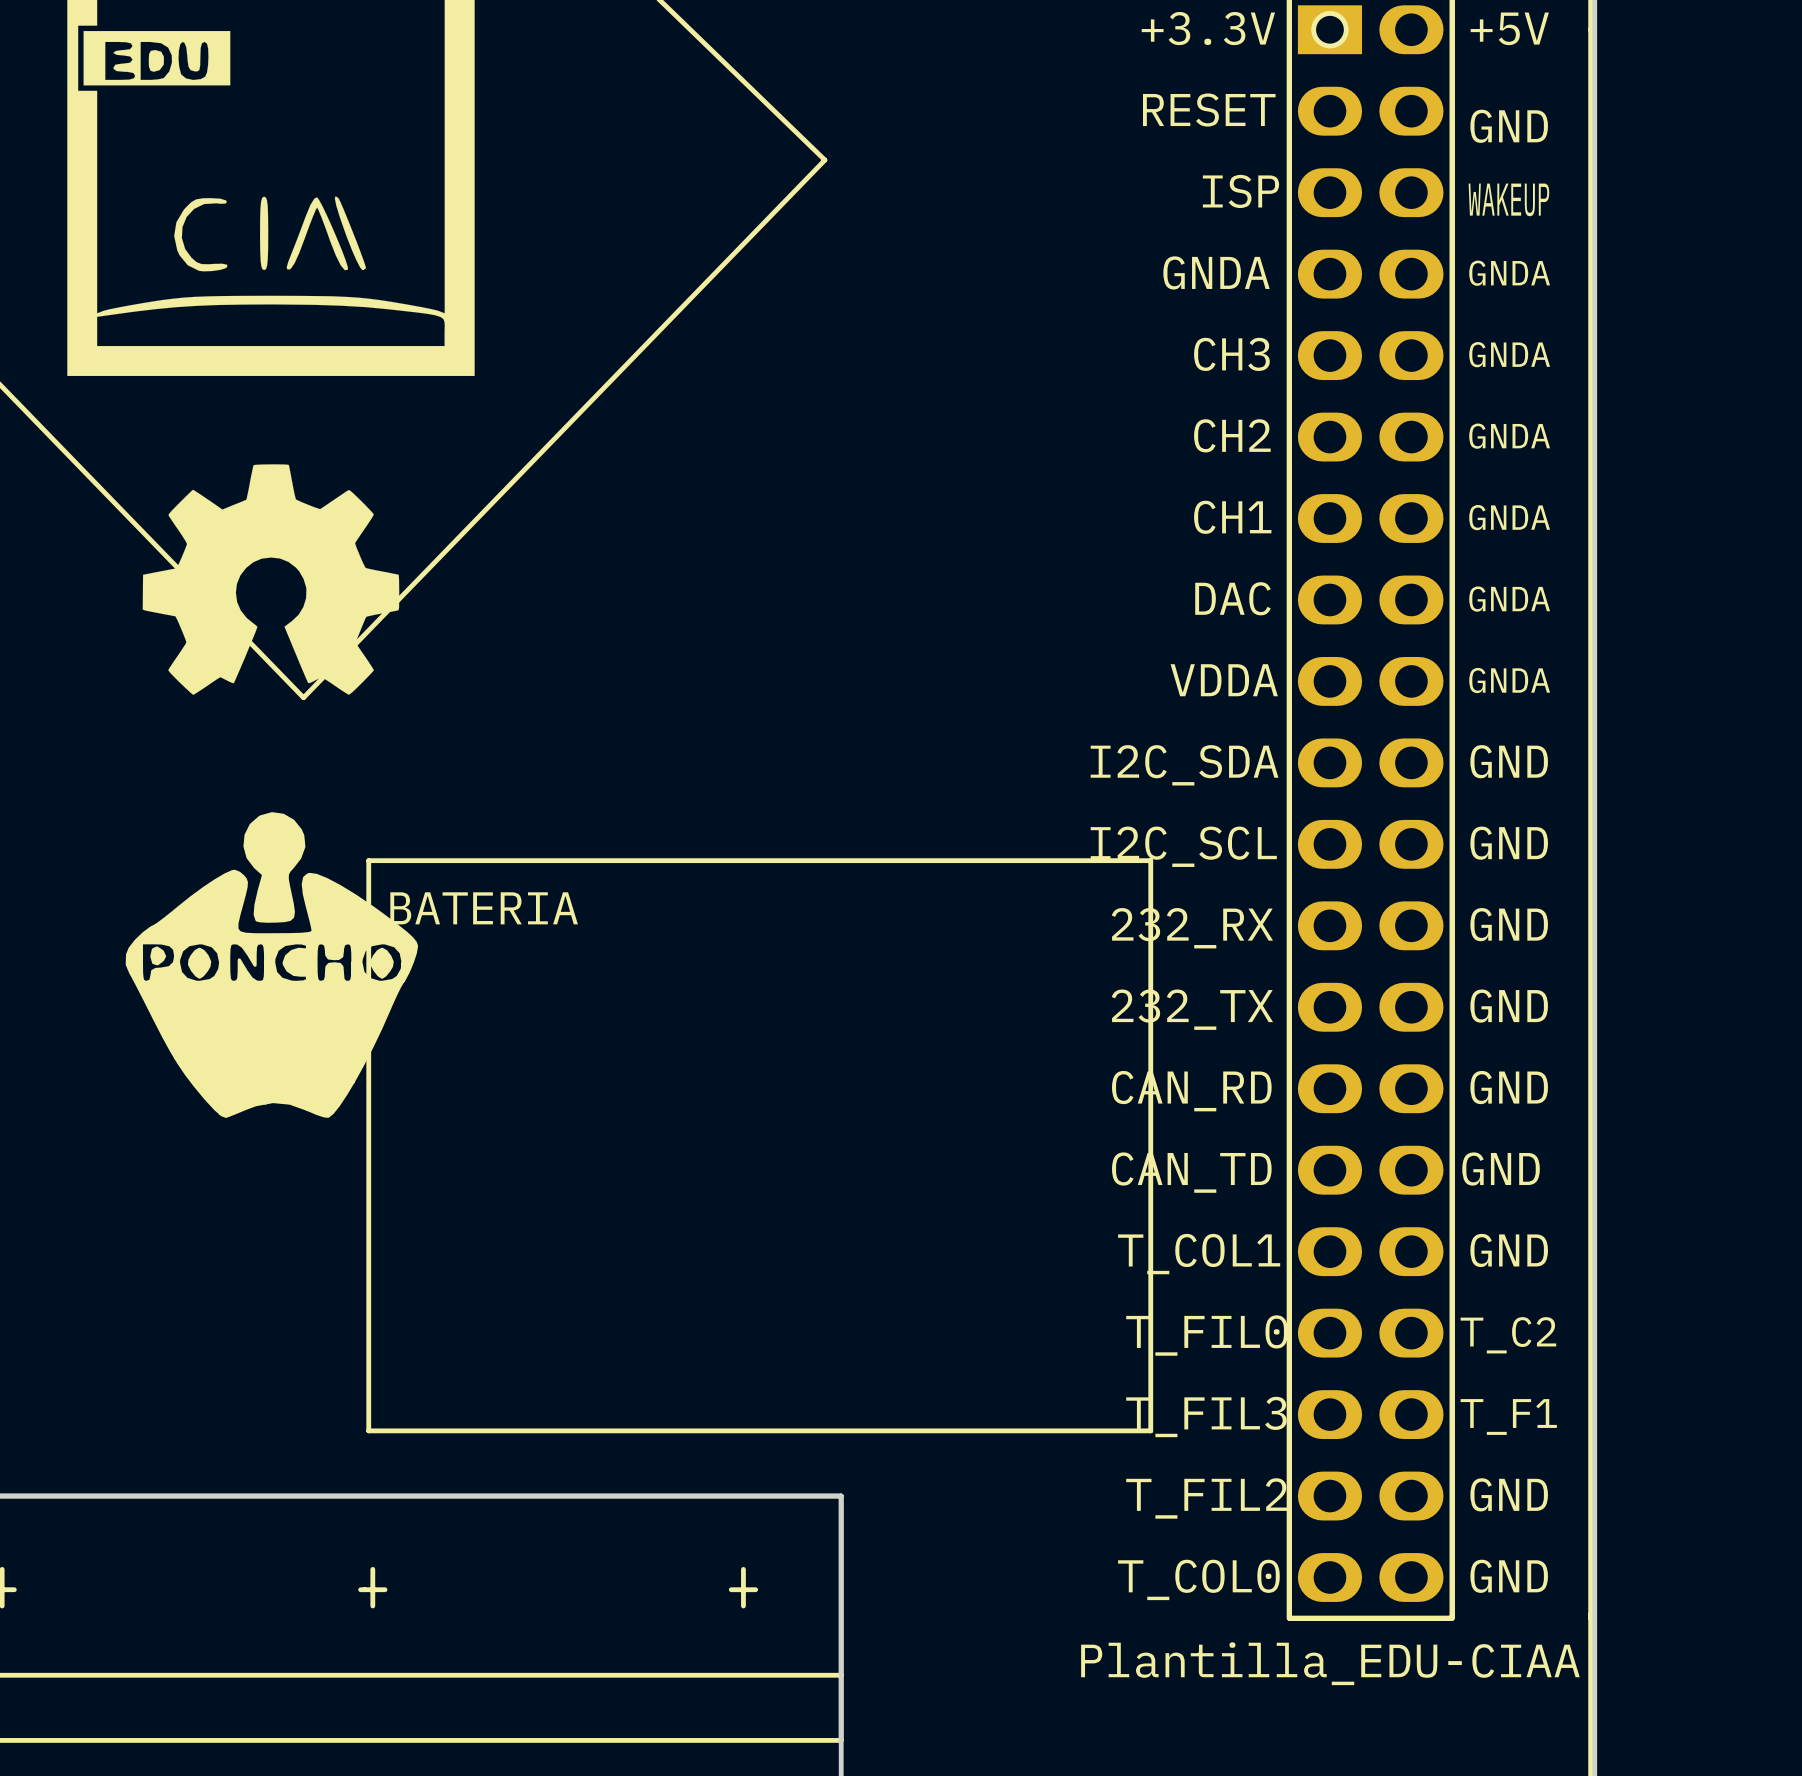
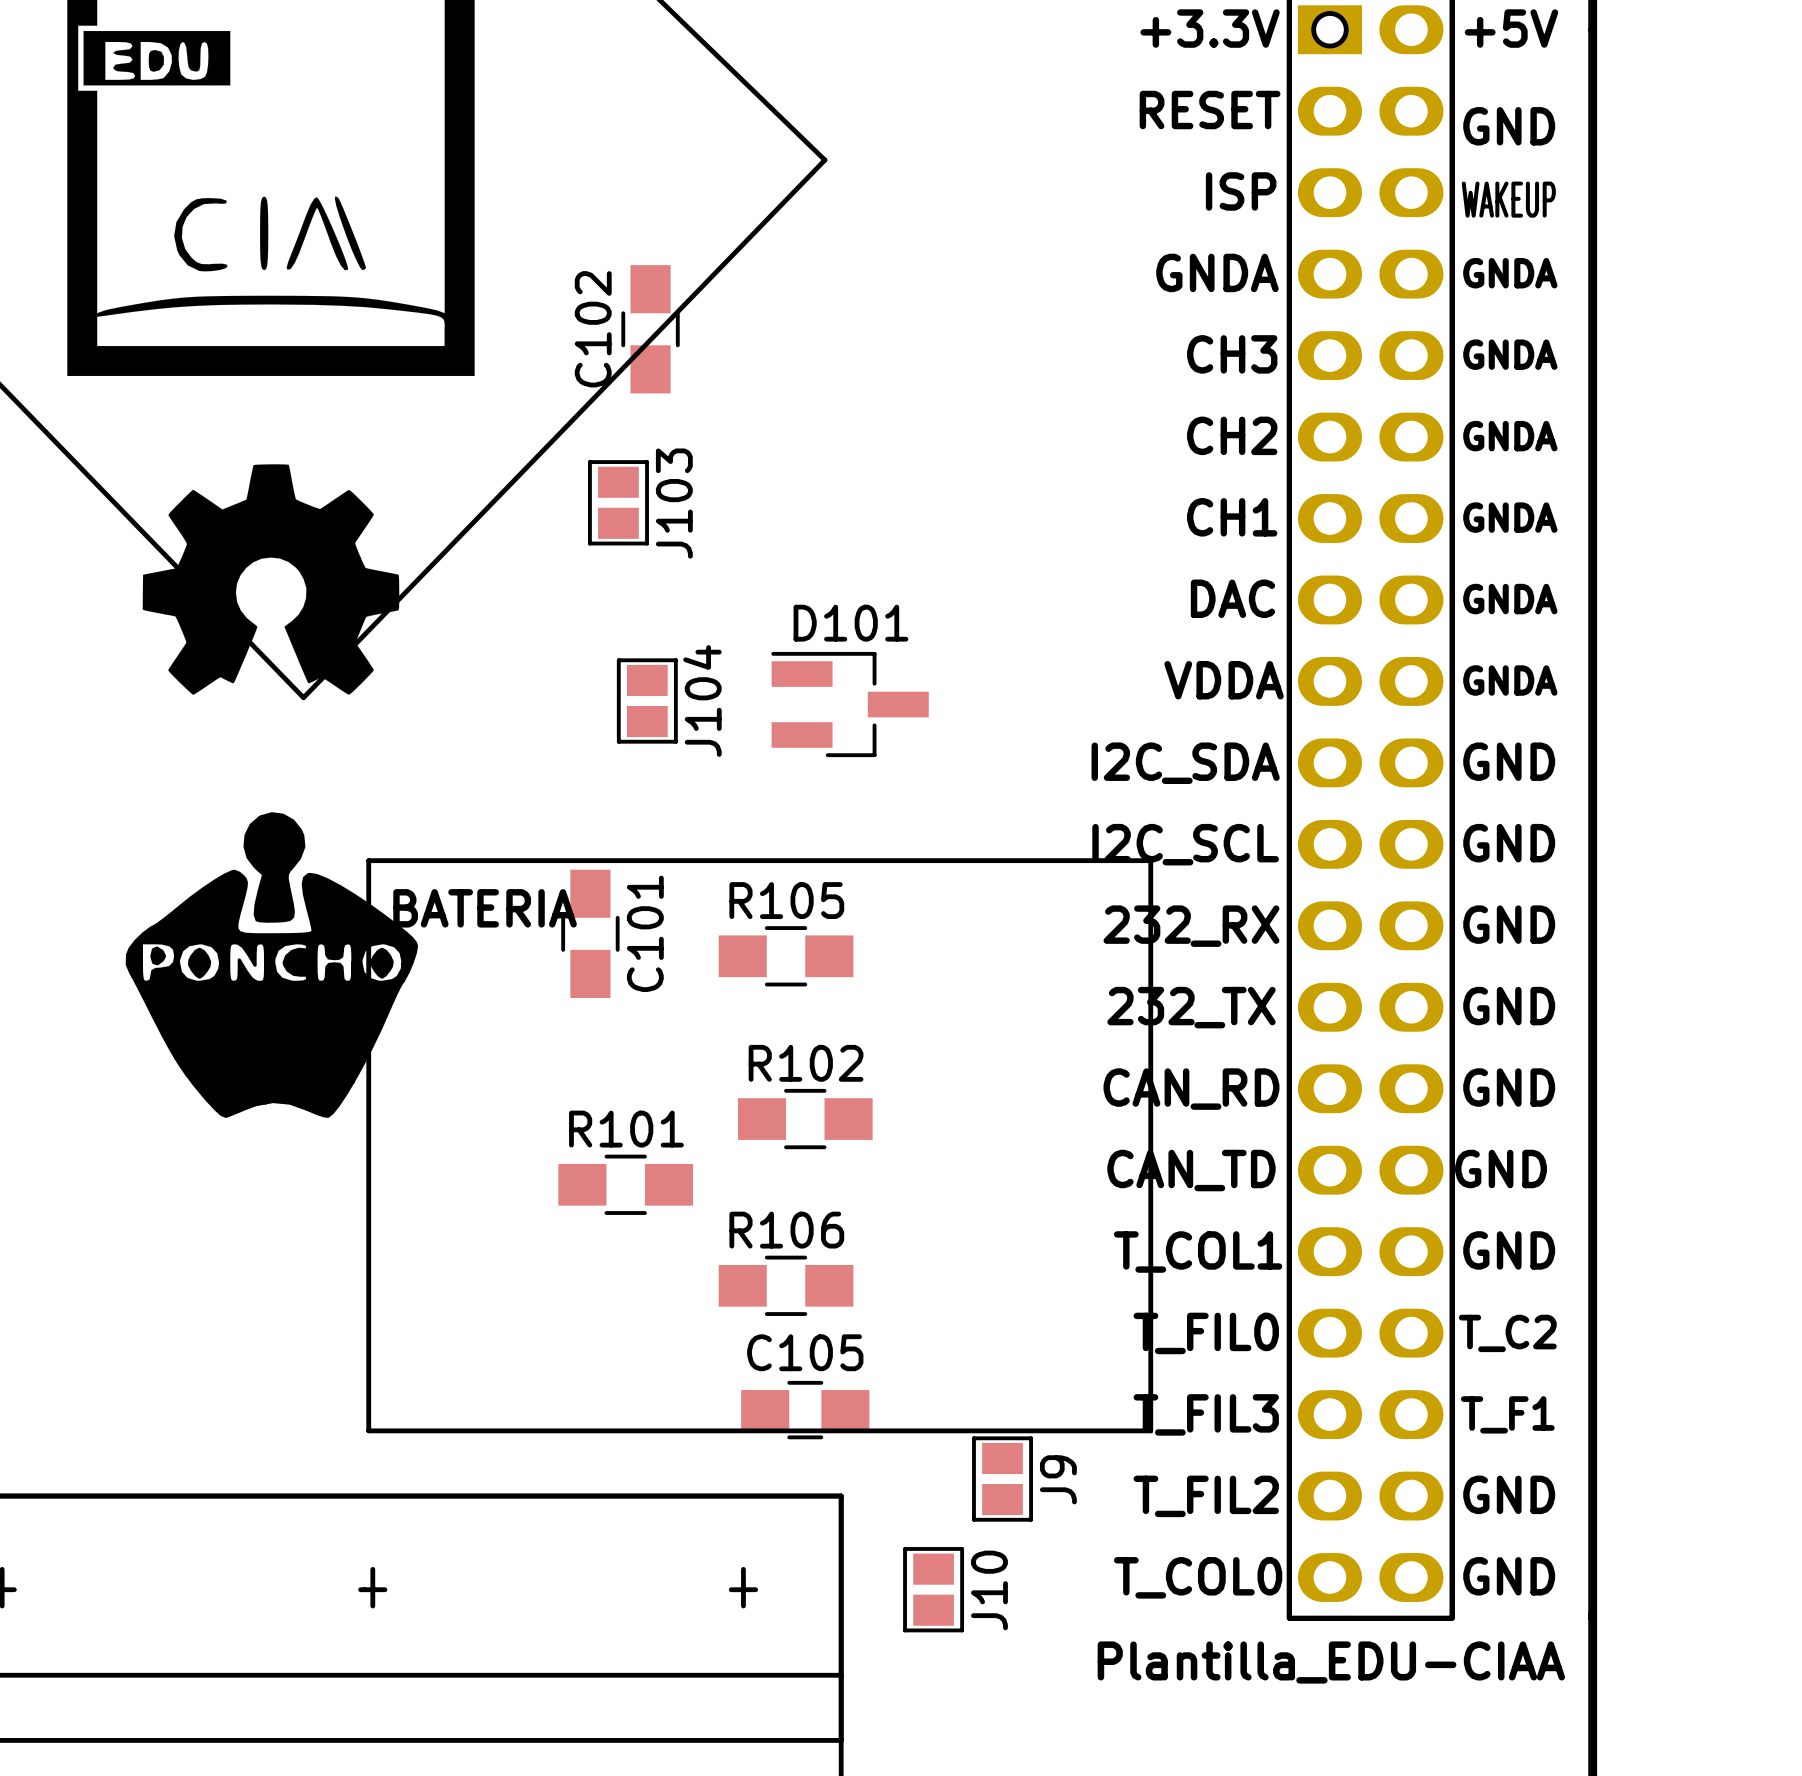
C102: none -> (650, 329)
J103: none -> (618, 502)
J104: none -> (647, 700)
D101: none -> (850, 704)
C101: none -> (590, 933)
R105: none -> (786, 956)
R102: none -> (805, 1119)
R101: none -> (625, 1184)
R106: none -> (786, 1285)
C105: none -> (805, 1410)
J9: none -> (1002, 1479)
J10: none -> (933, 1589)

